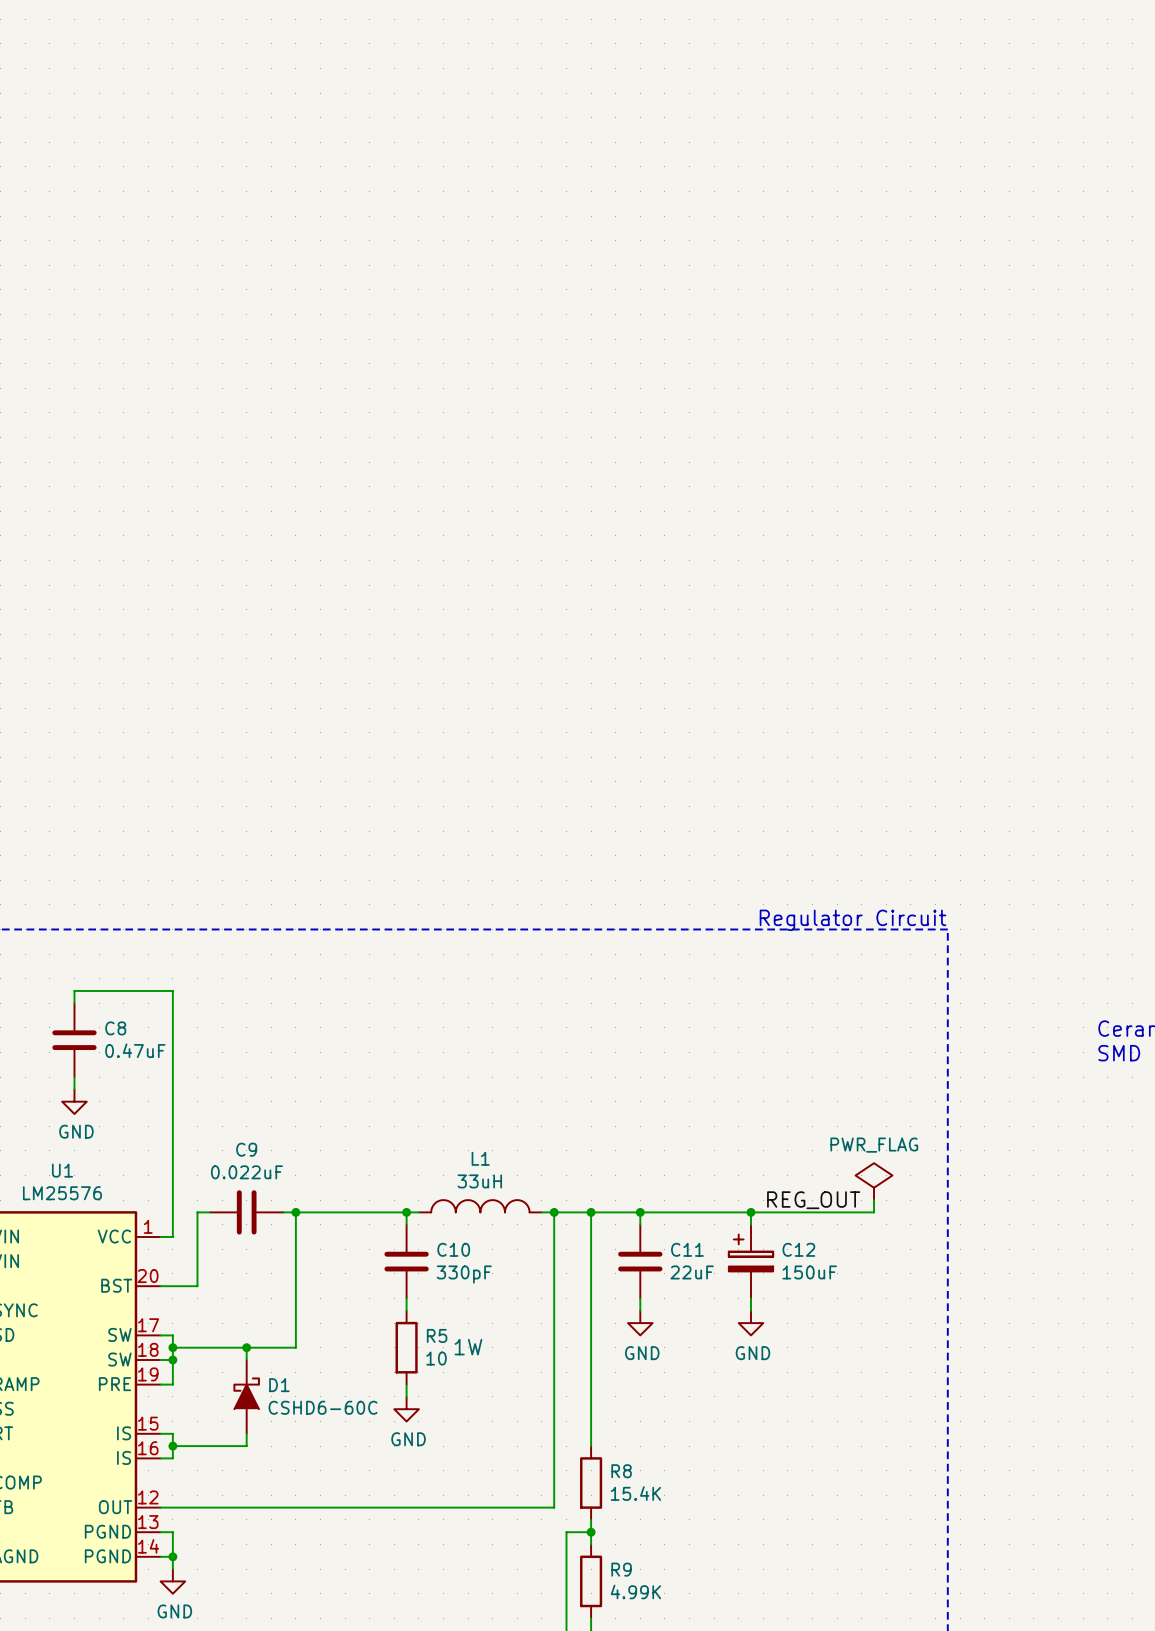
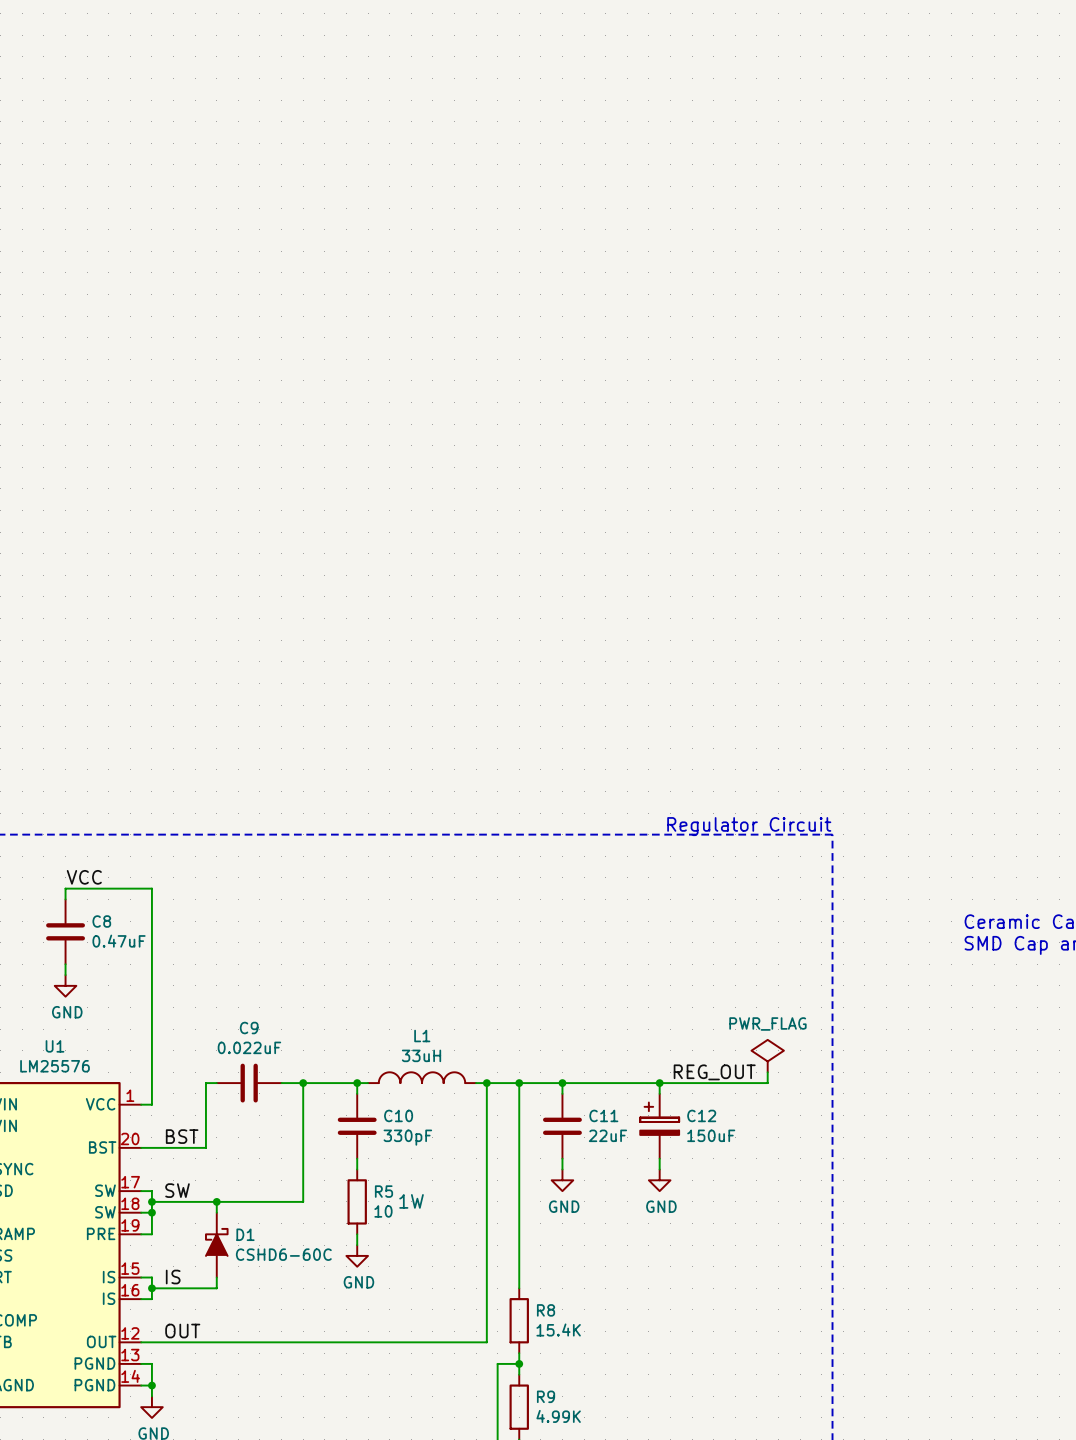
label: none -> VCC (84, 877)
wire: (209, 1212) (197, 1212) (197, 1286) -> (216, 1083) (205, 1083) (205, 1147) (173, 1147)
C9 position: (246, 1212) -> (249, 1083)
wire: (295, 1212) (295, 1347) -> (303, 1083) (303, 1201) (259, 1201)
junction position: (295, 1212) -> (303, 1083)
label: none -> BST (182, 1136)
label: none -> SW (177, 1190)
label: none -> IS (173, 1277)
label: none -> OUT (182, 1331)

